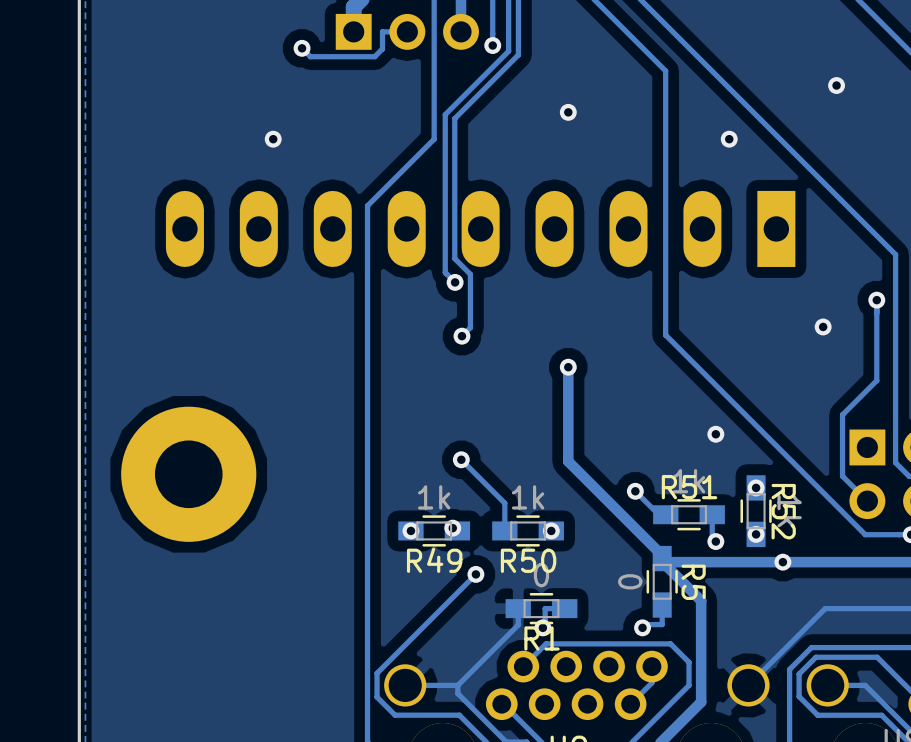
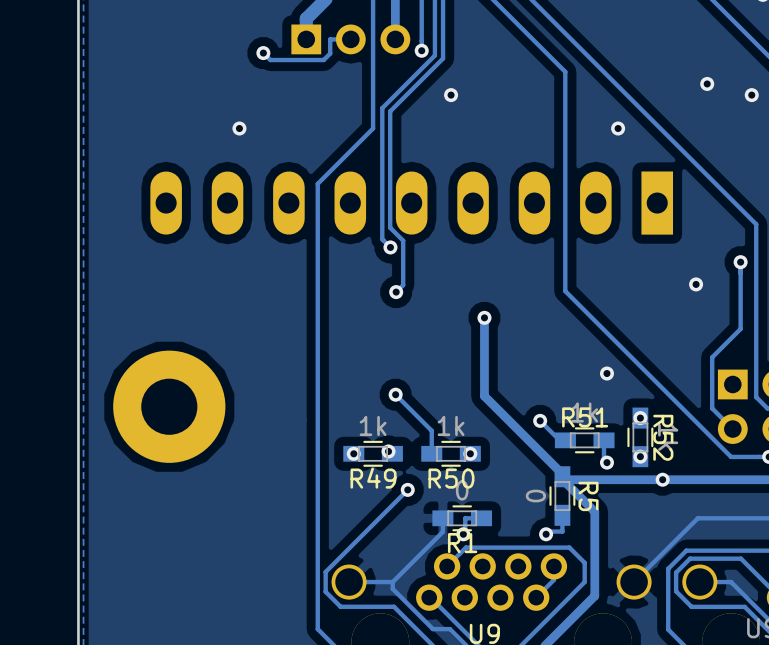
via: none -> (751, 95)
via position: (568, 112) -> (451, 95)

